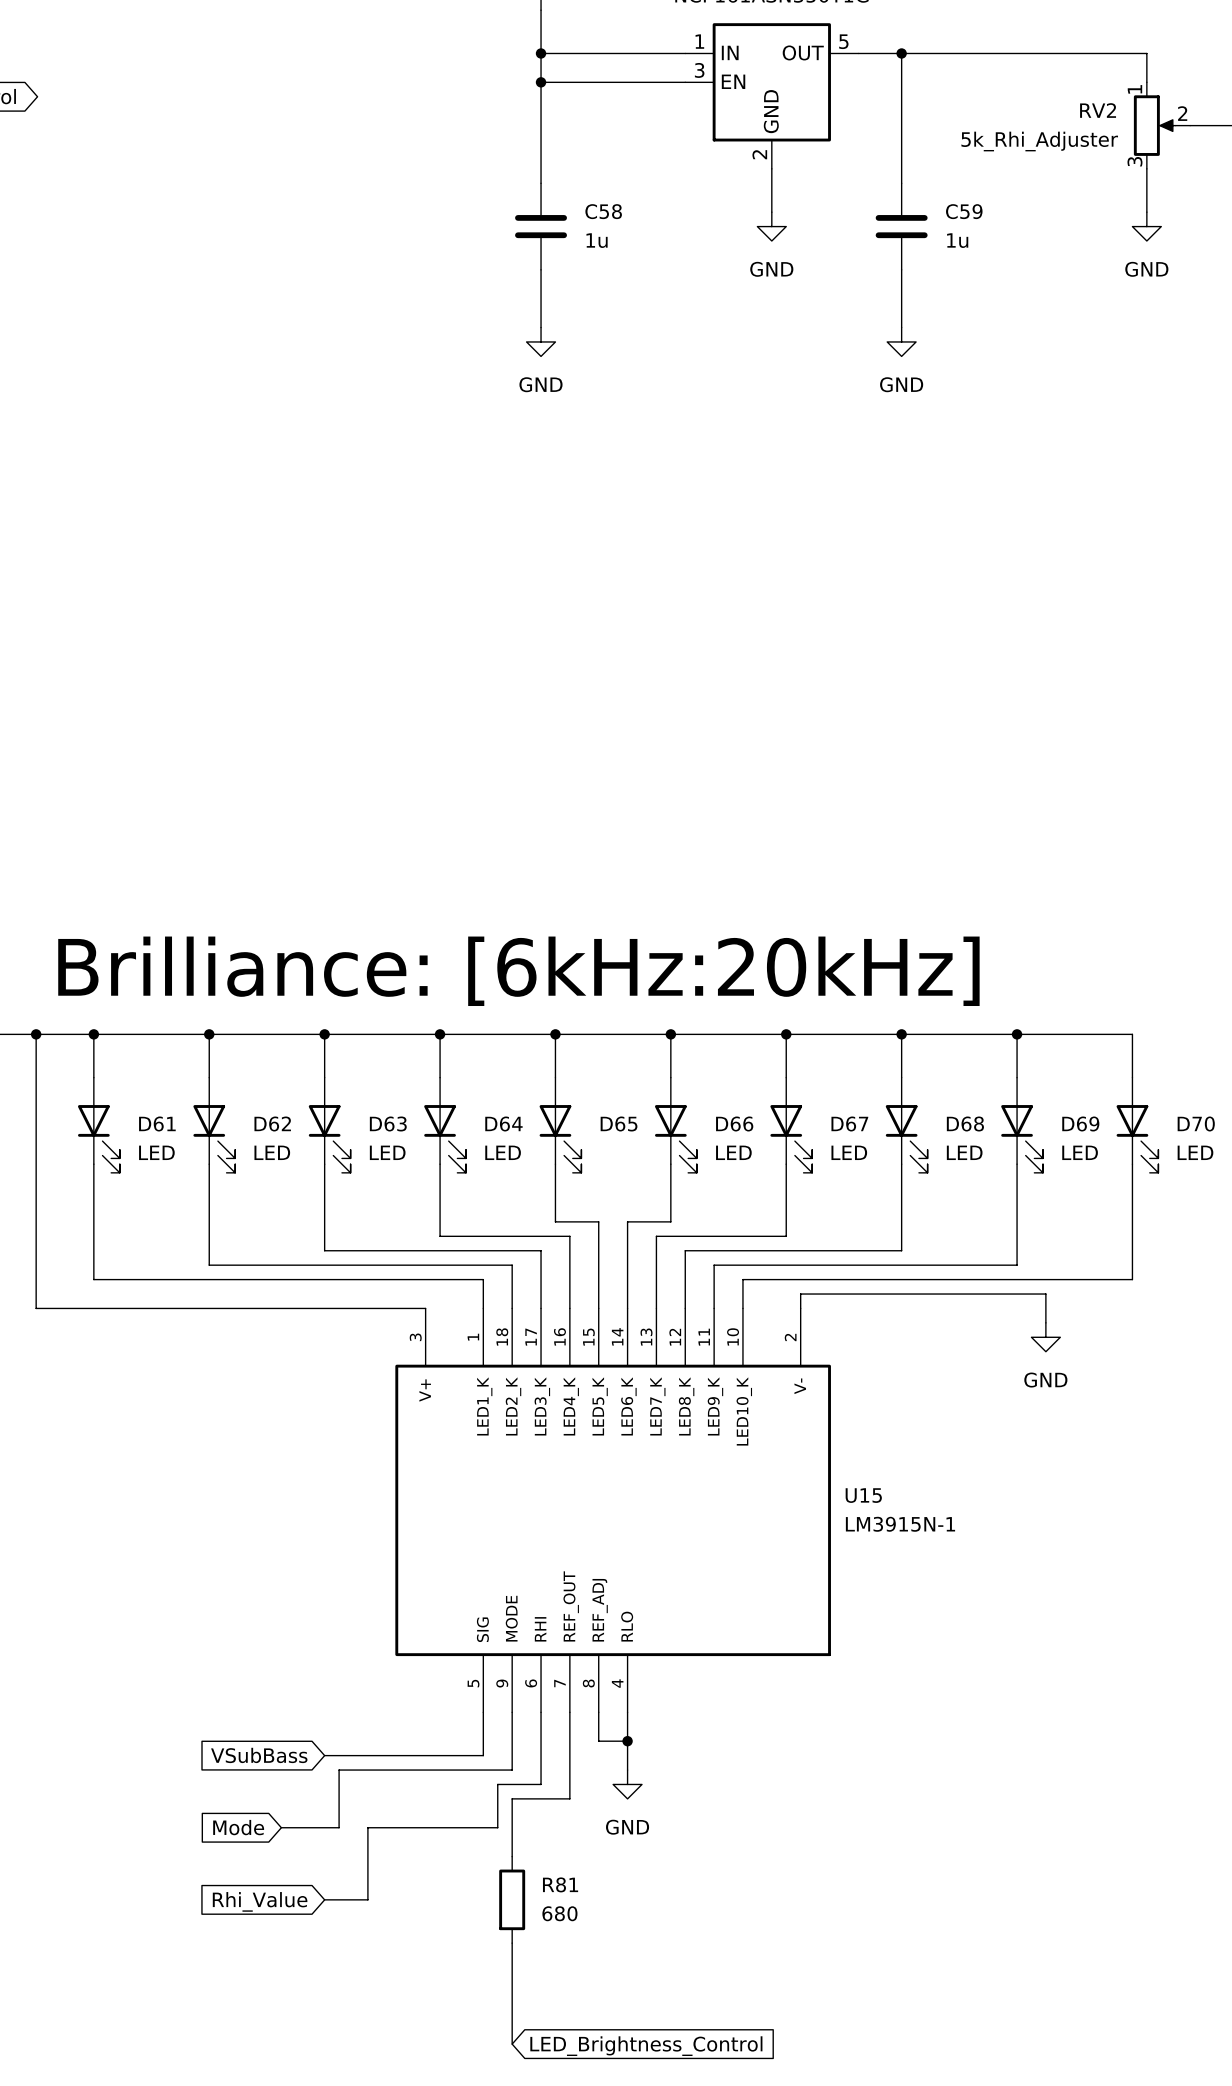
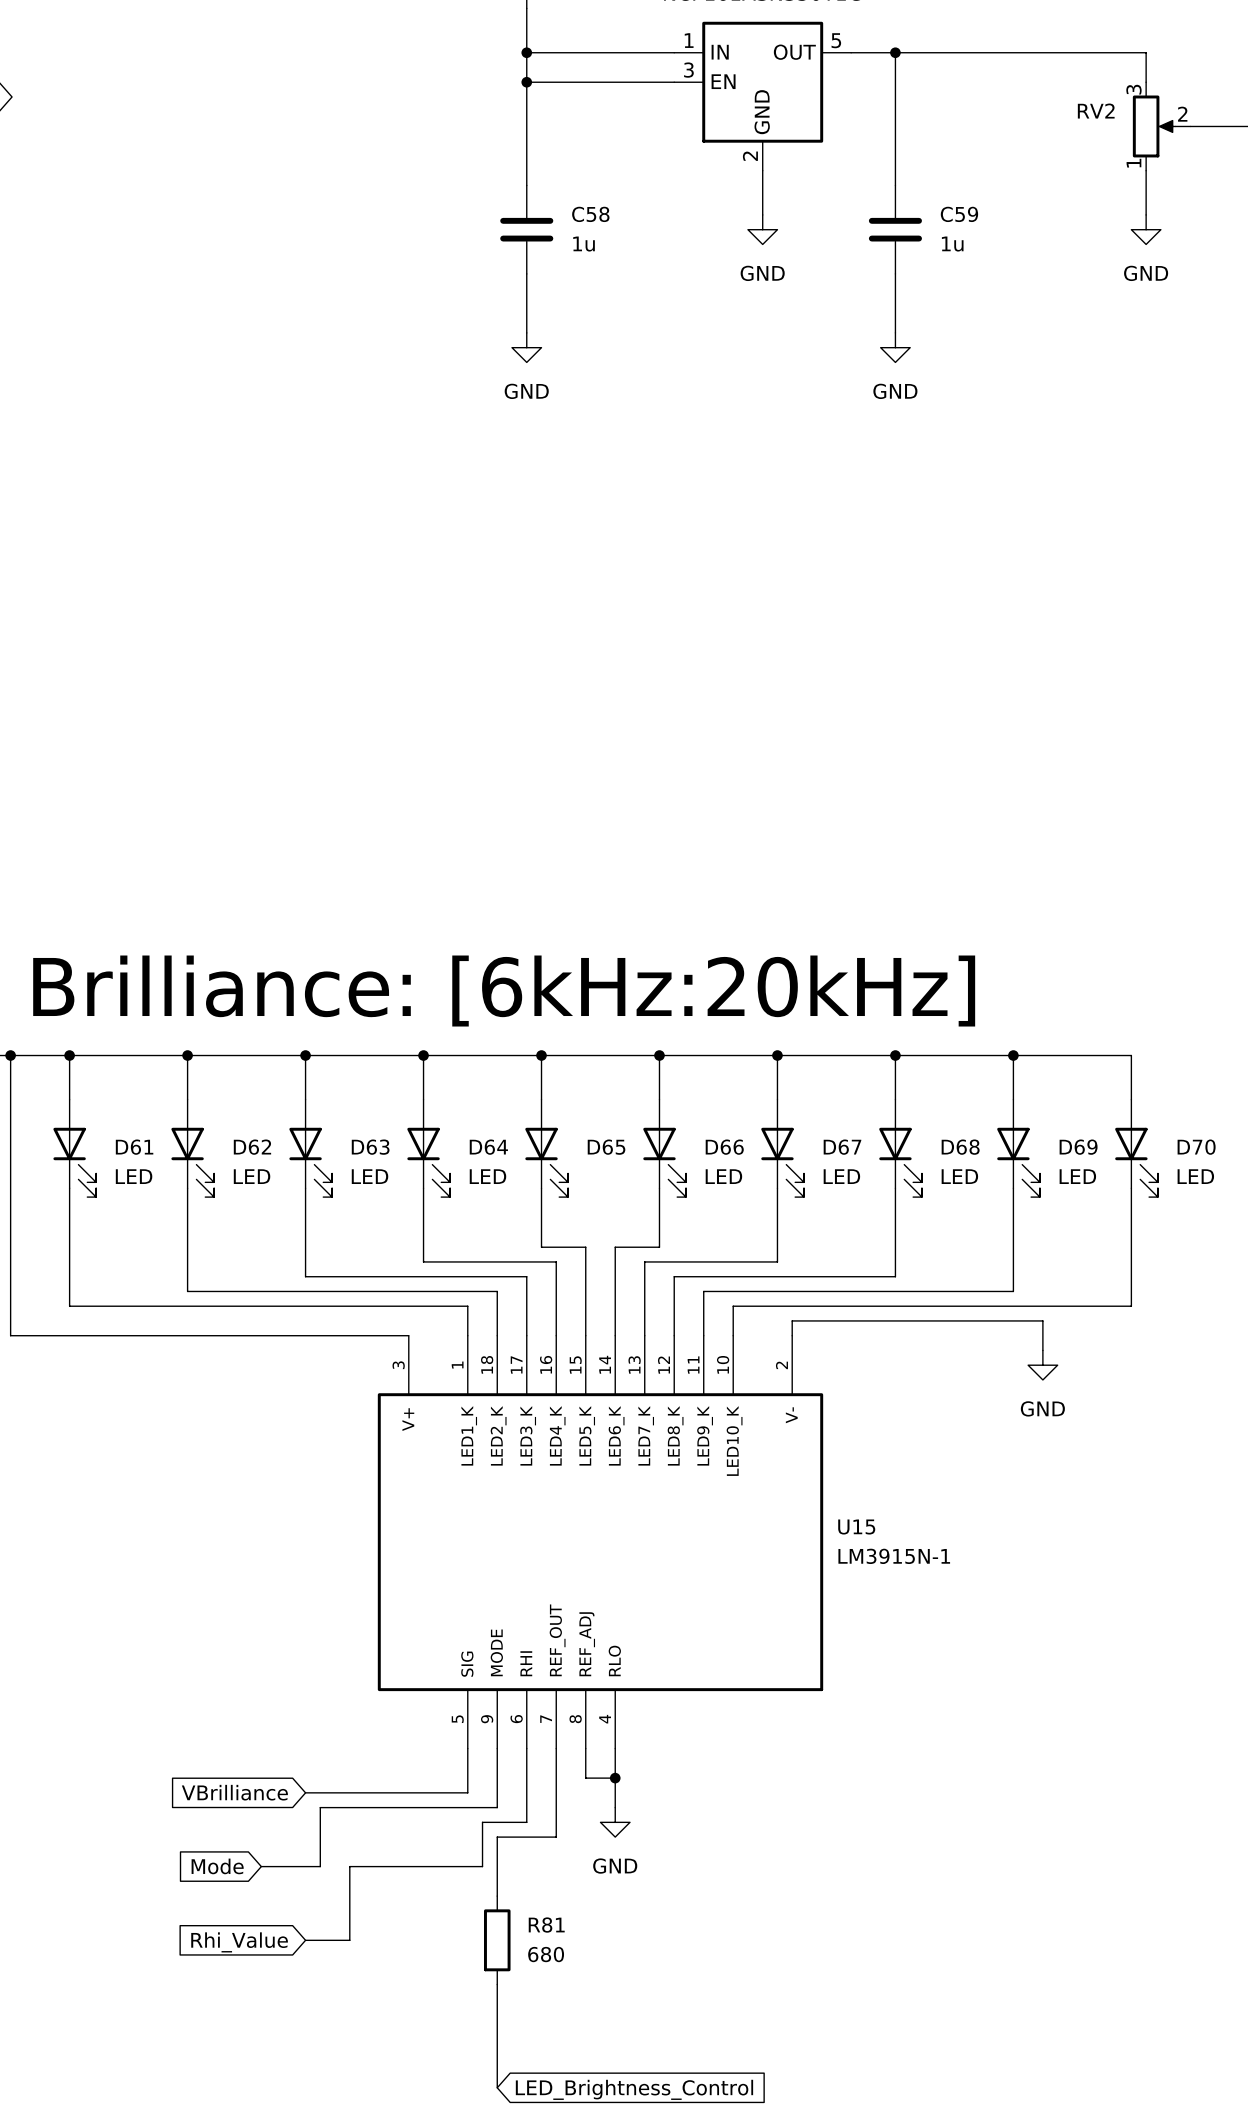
RV2 flip: as is (1154, 125) -> up-down (1154, 126)
RV2 value: 5k_Rhi_Adjuster (1039, 141) -> none
global label: VSubBass (259, 1755) -> VBrilliance (234, 1792)

